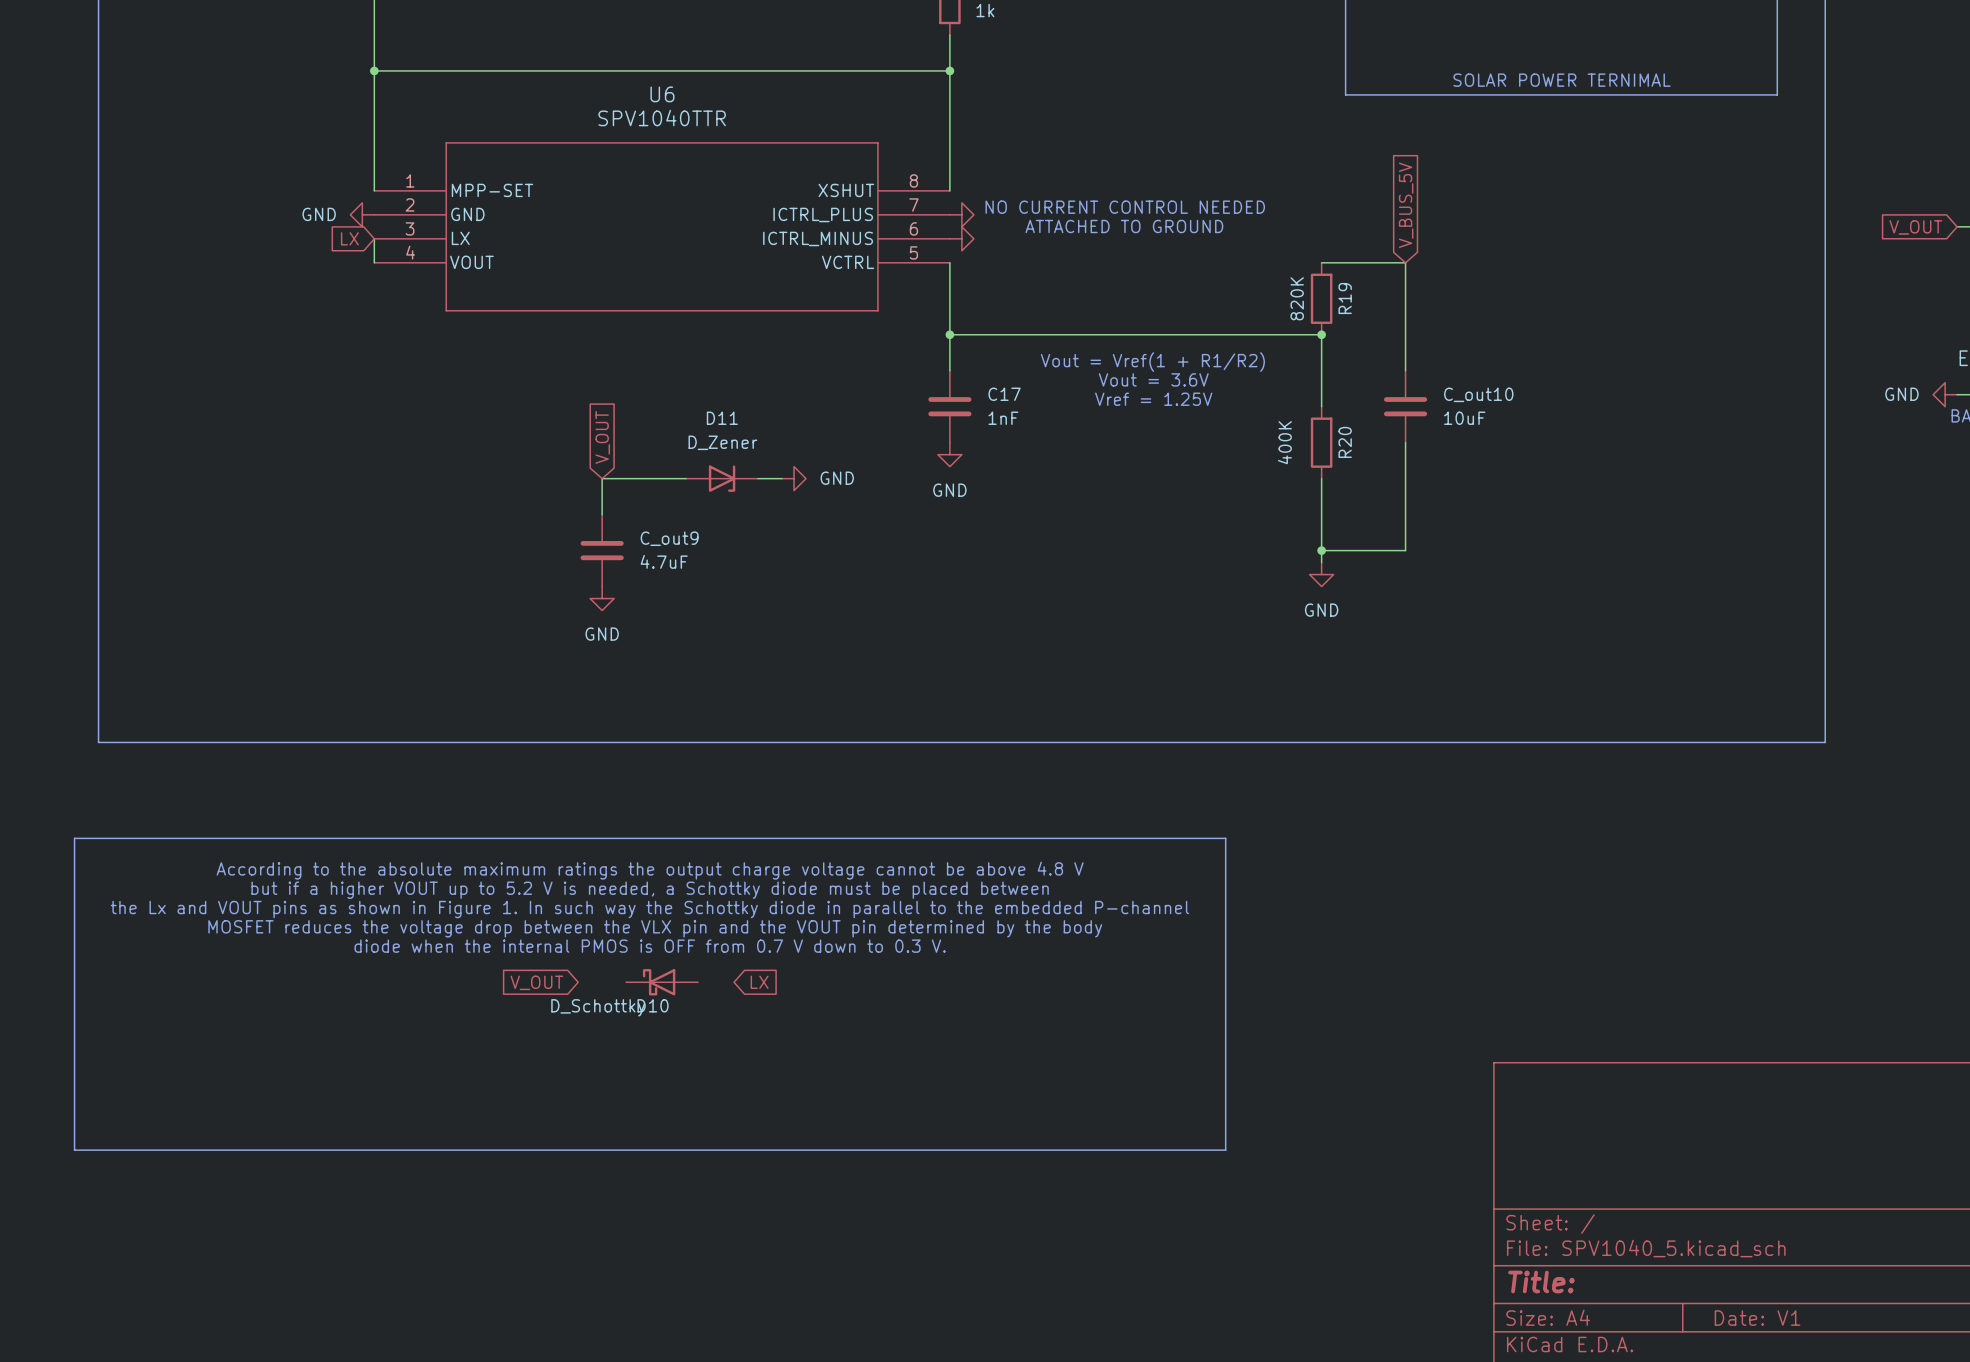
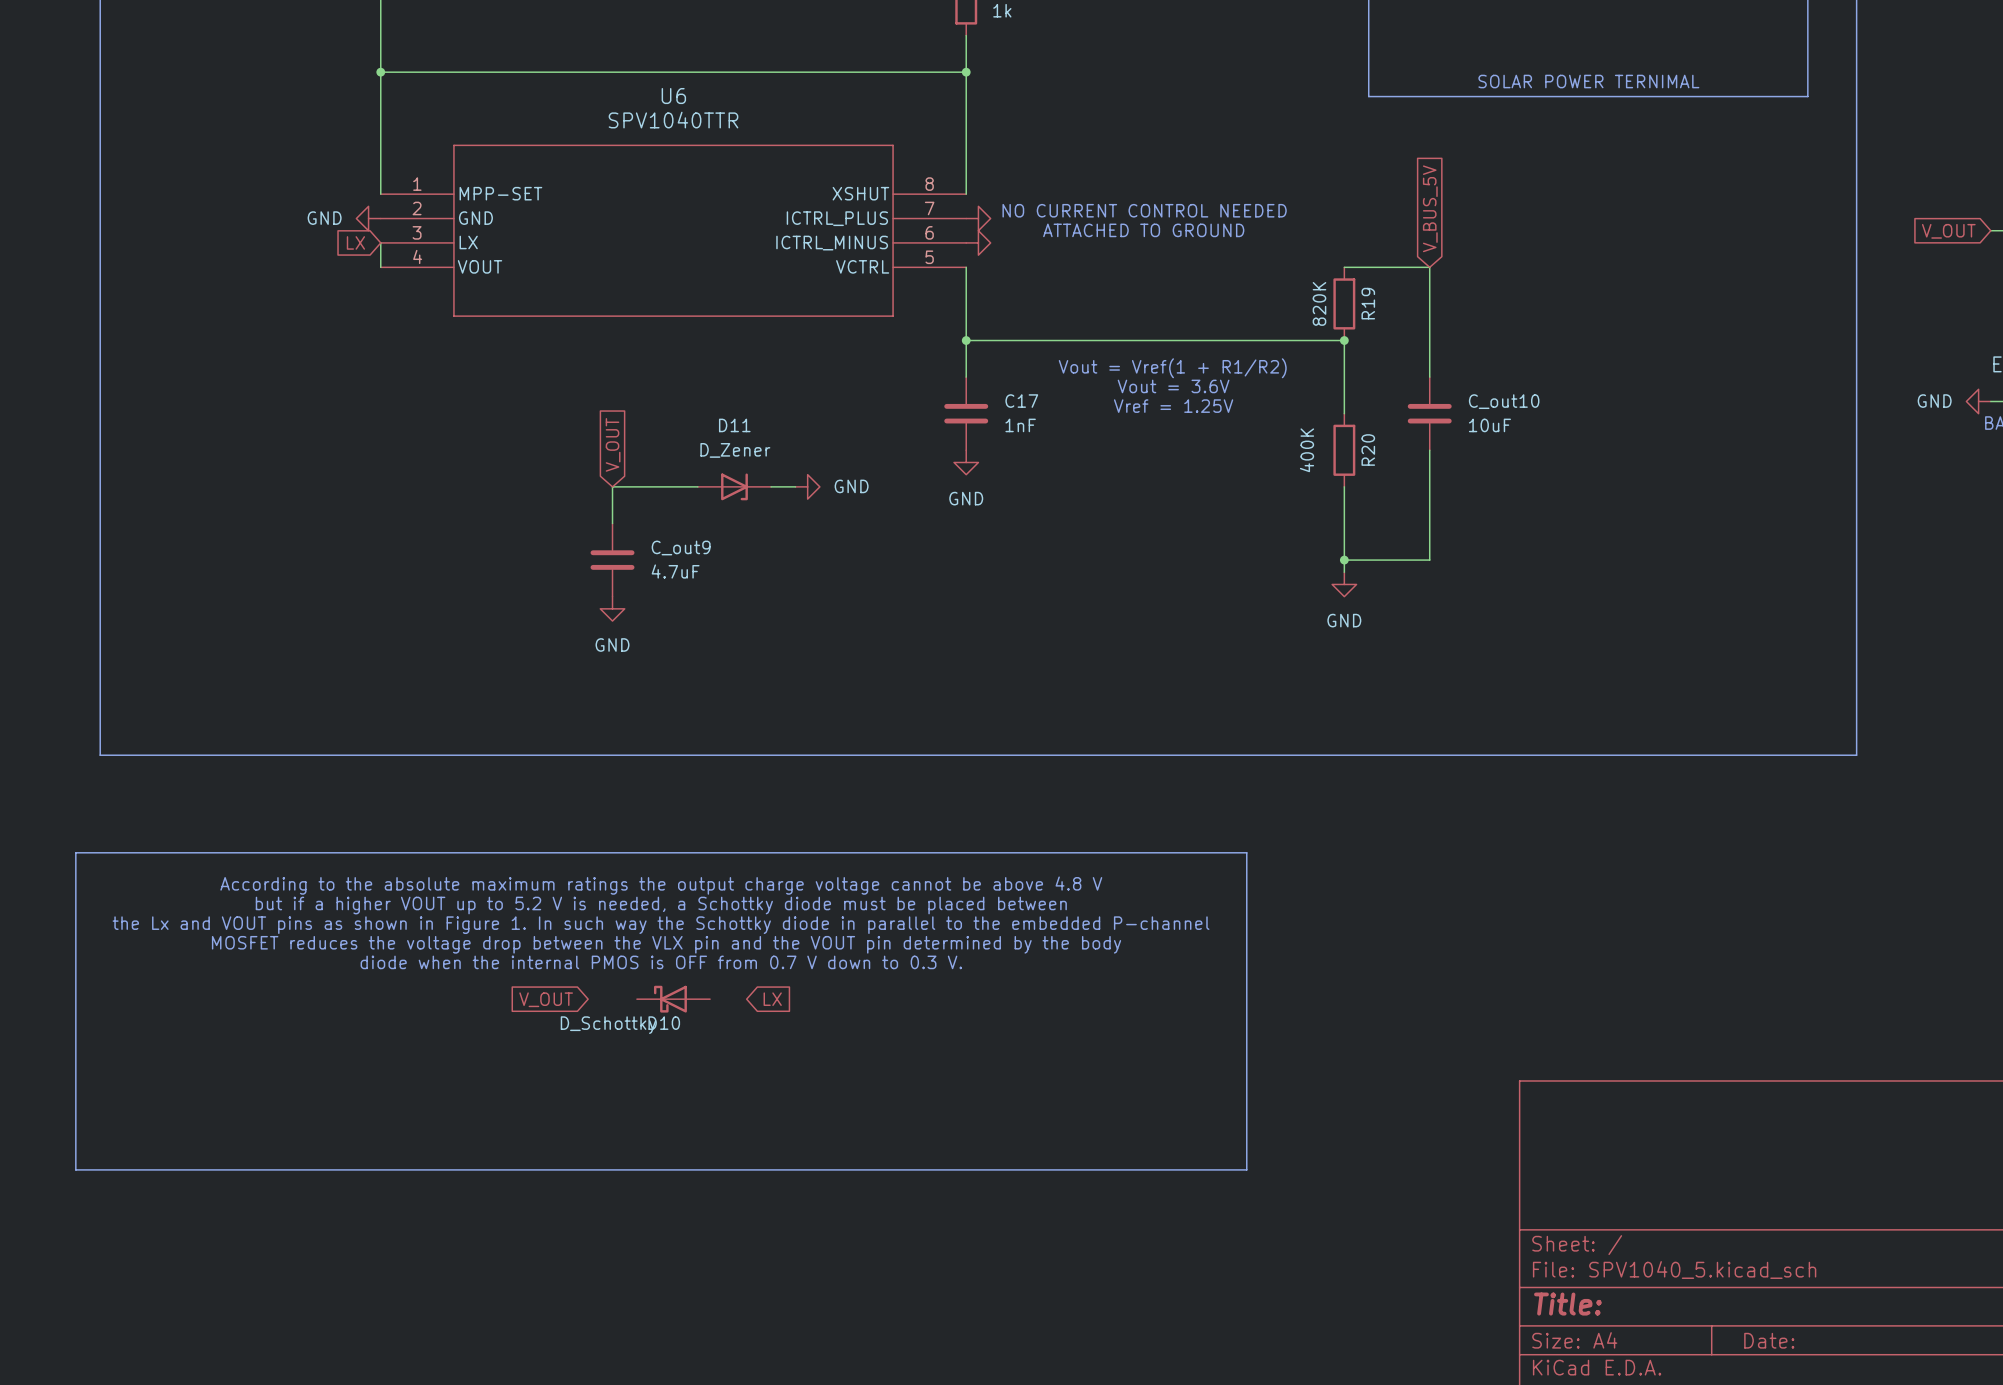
title block: Date: V1 (1757, 1318) -> Date: (1769, 1340)

